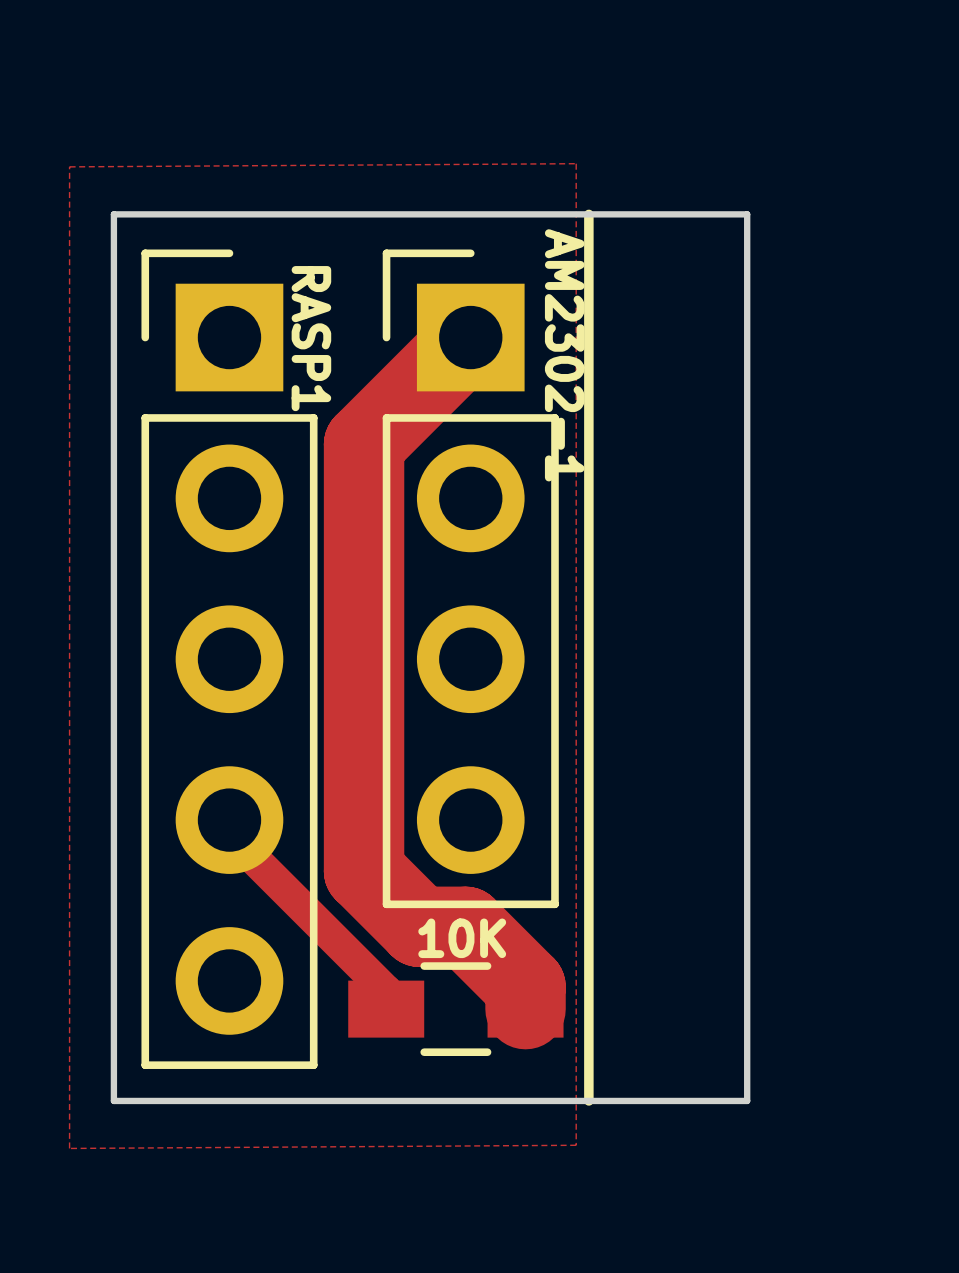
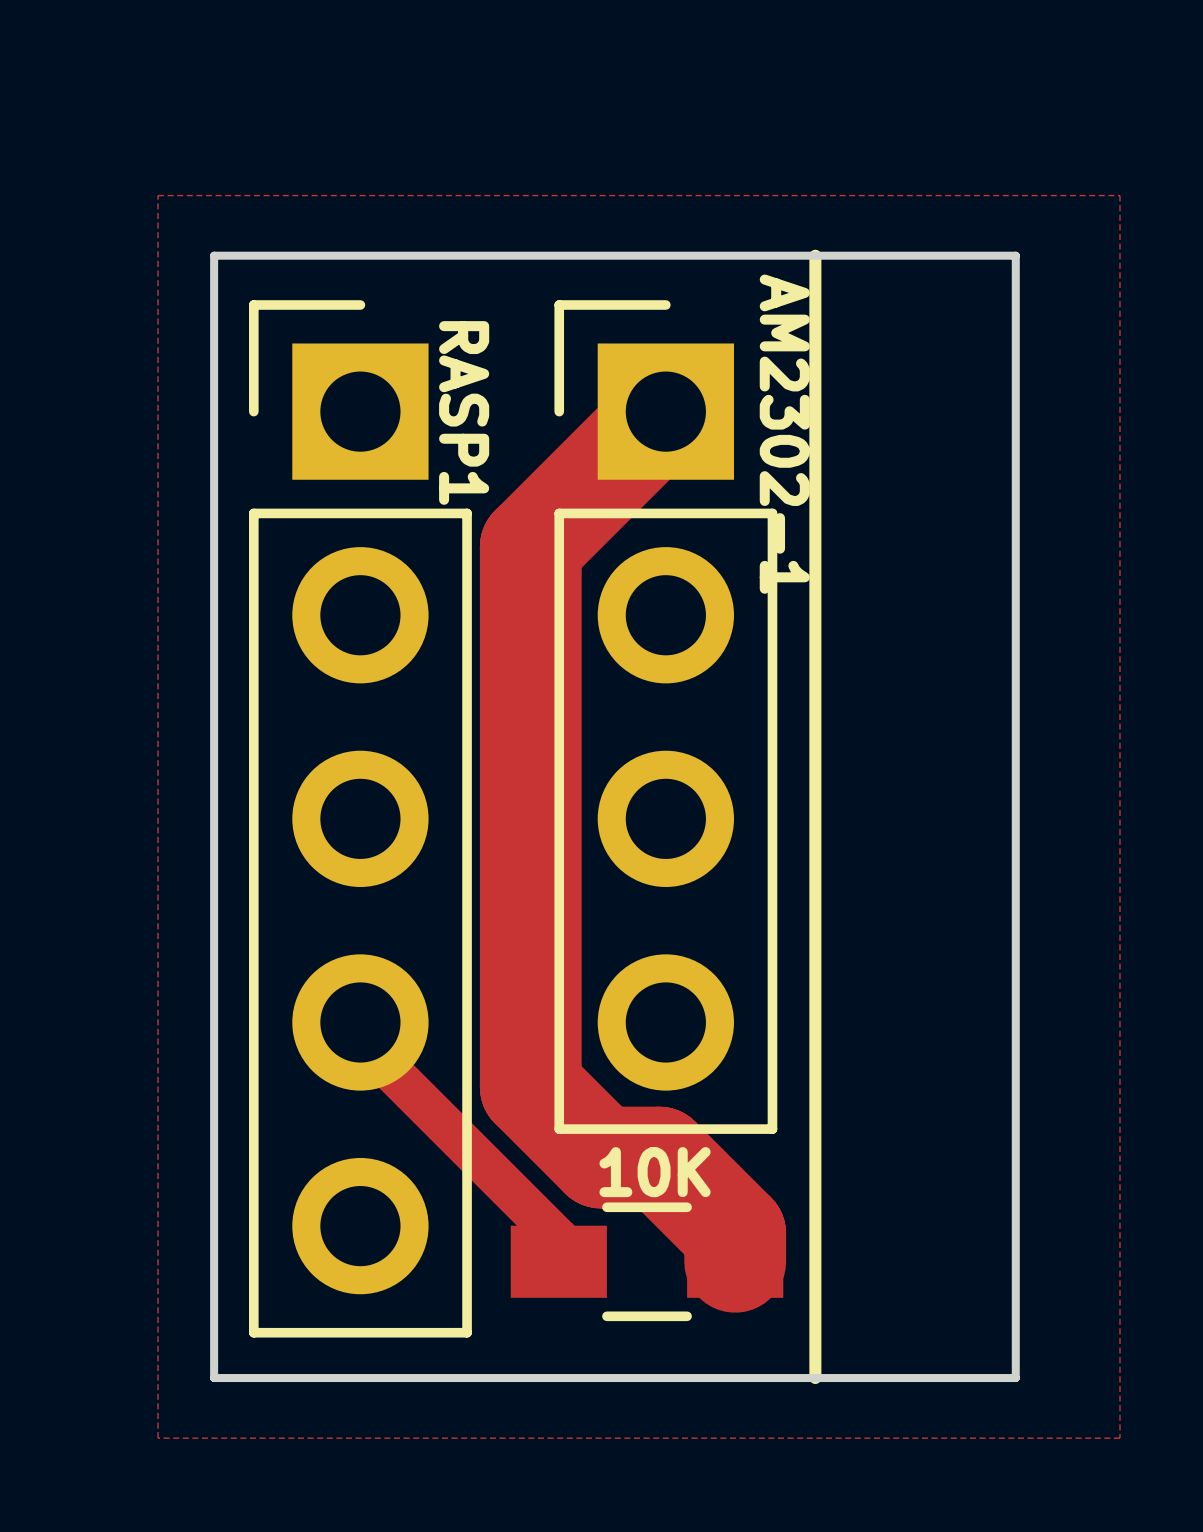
zone outline: (69, 166) (576, 163) (576, 1145) (69, 1148) -> (158, 195) (1120, 195) (1120, 1438) (158, 1438)

